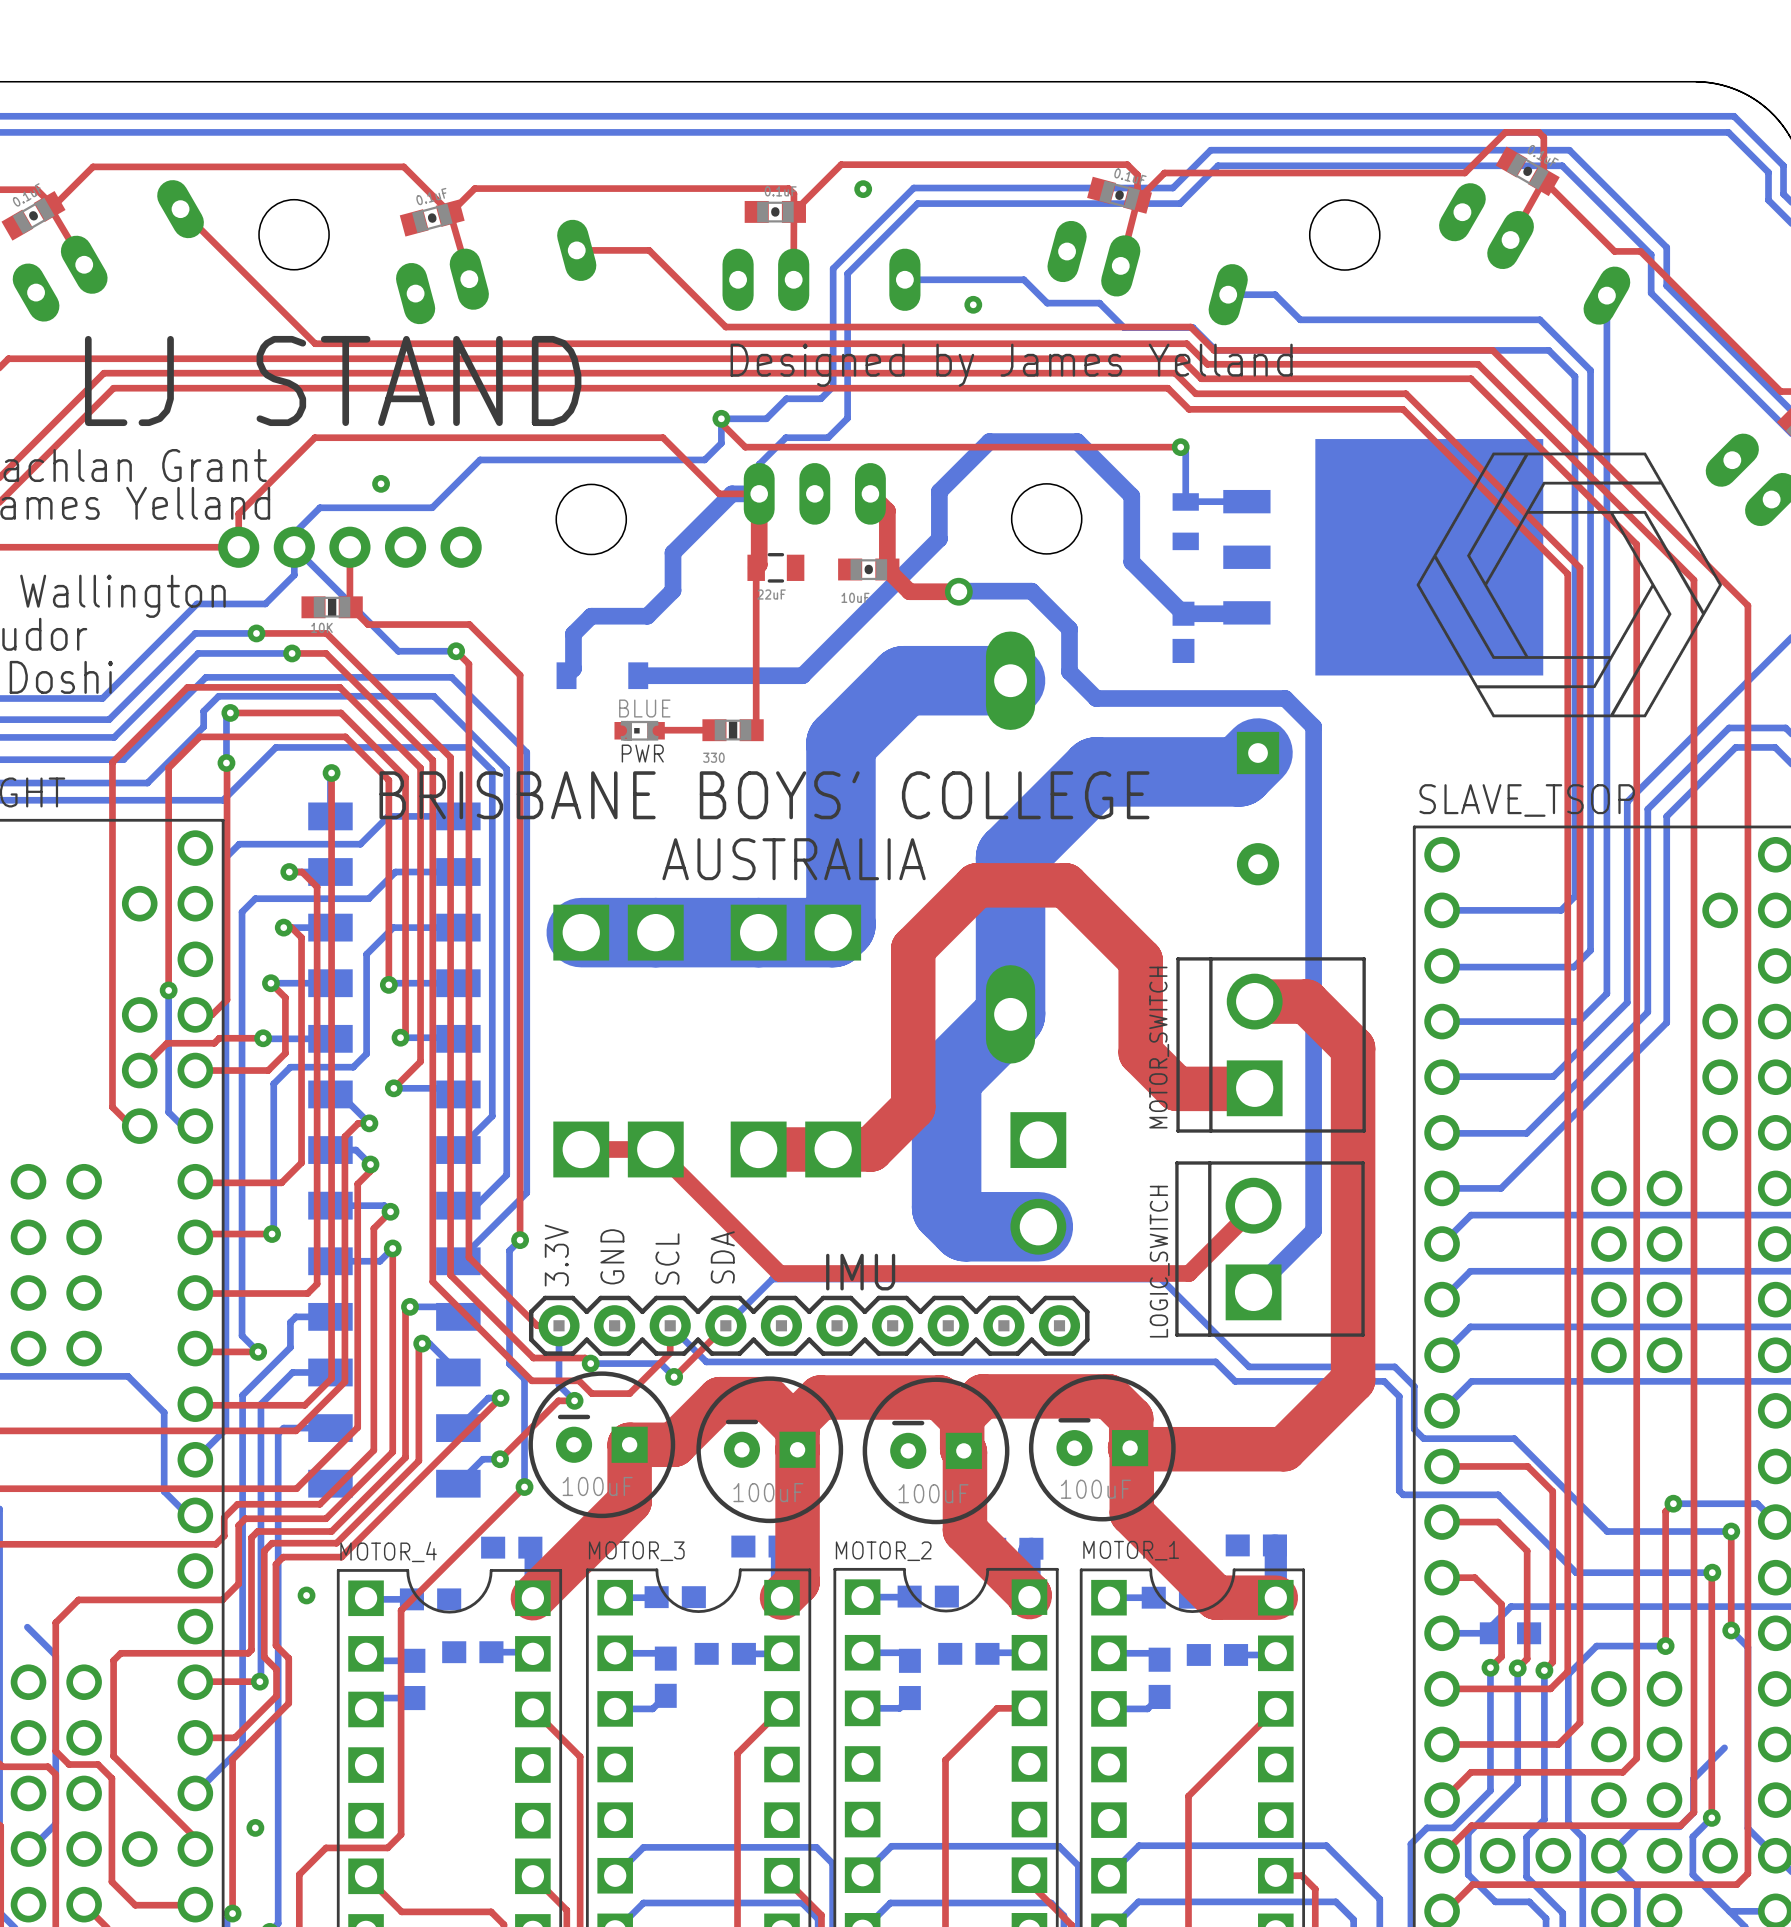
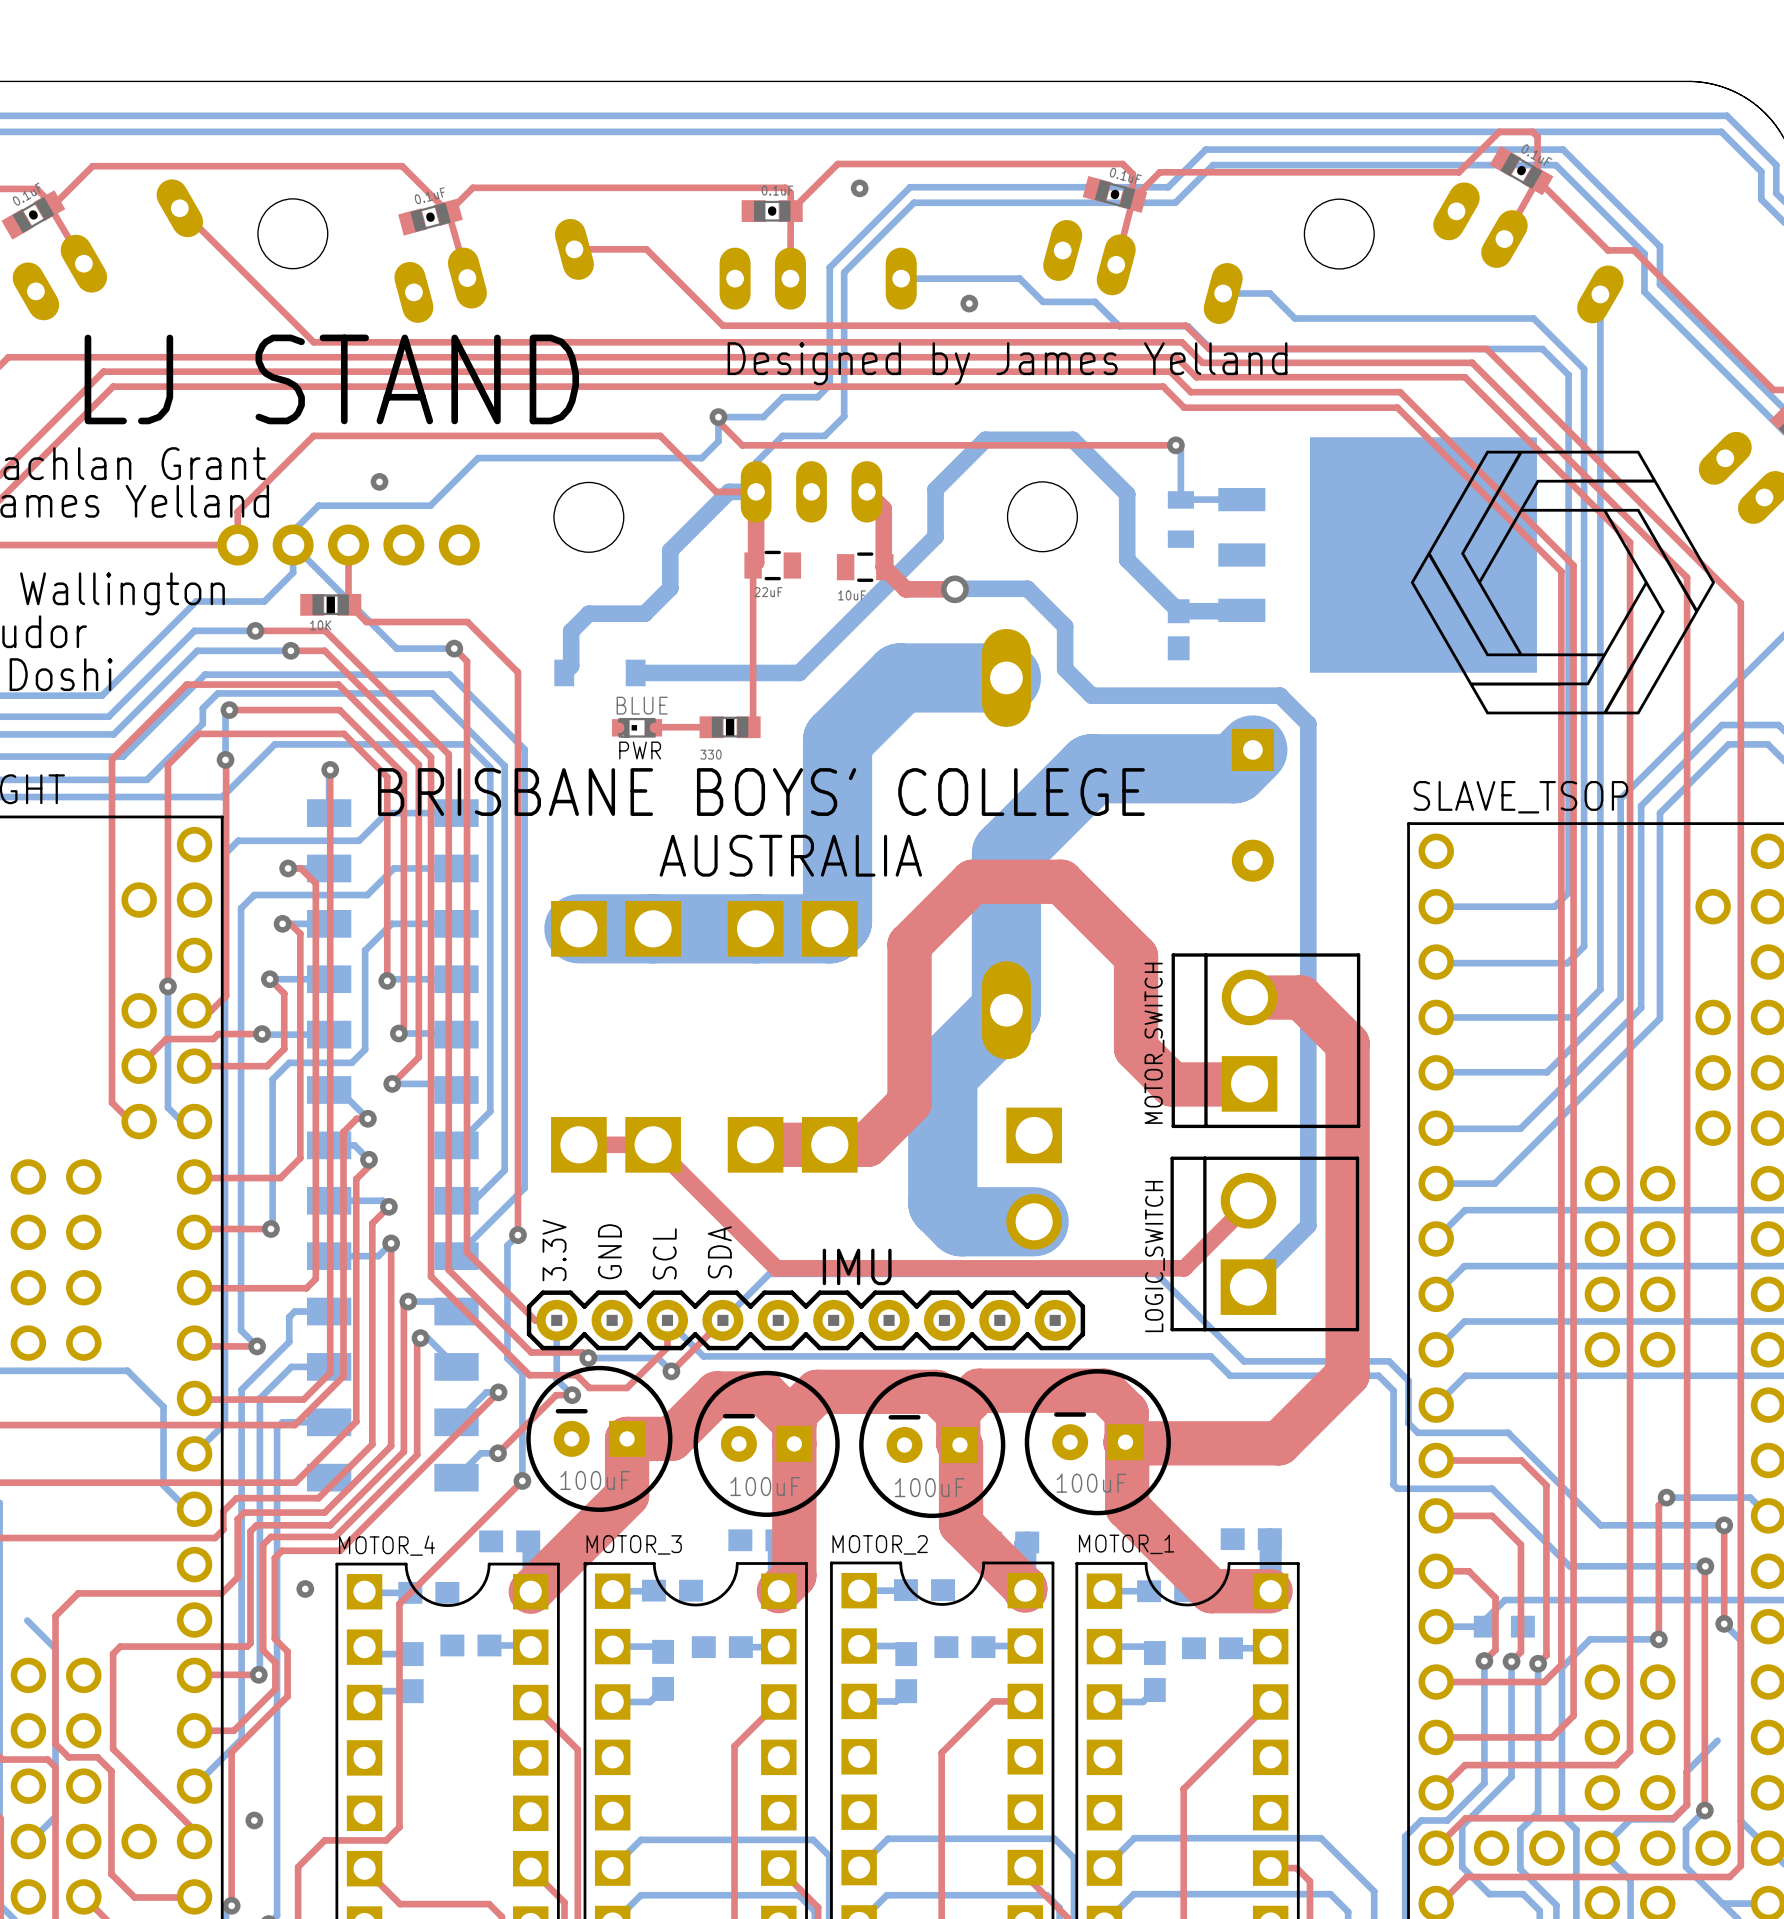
part footprint: [838, 558, 900, 581] -> [836, 552, 894, 582]

